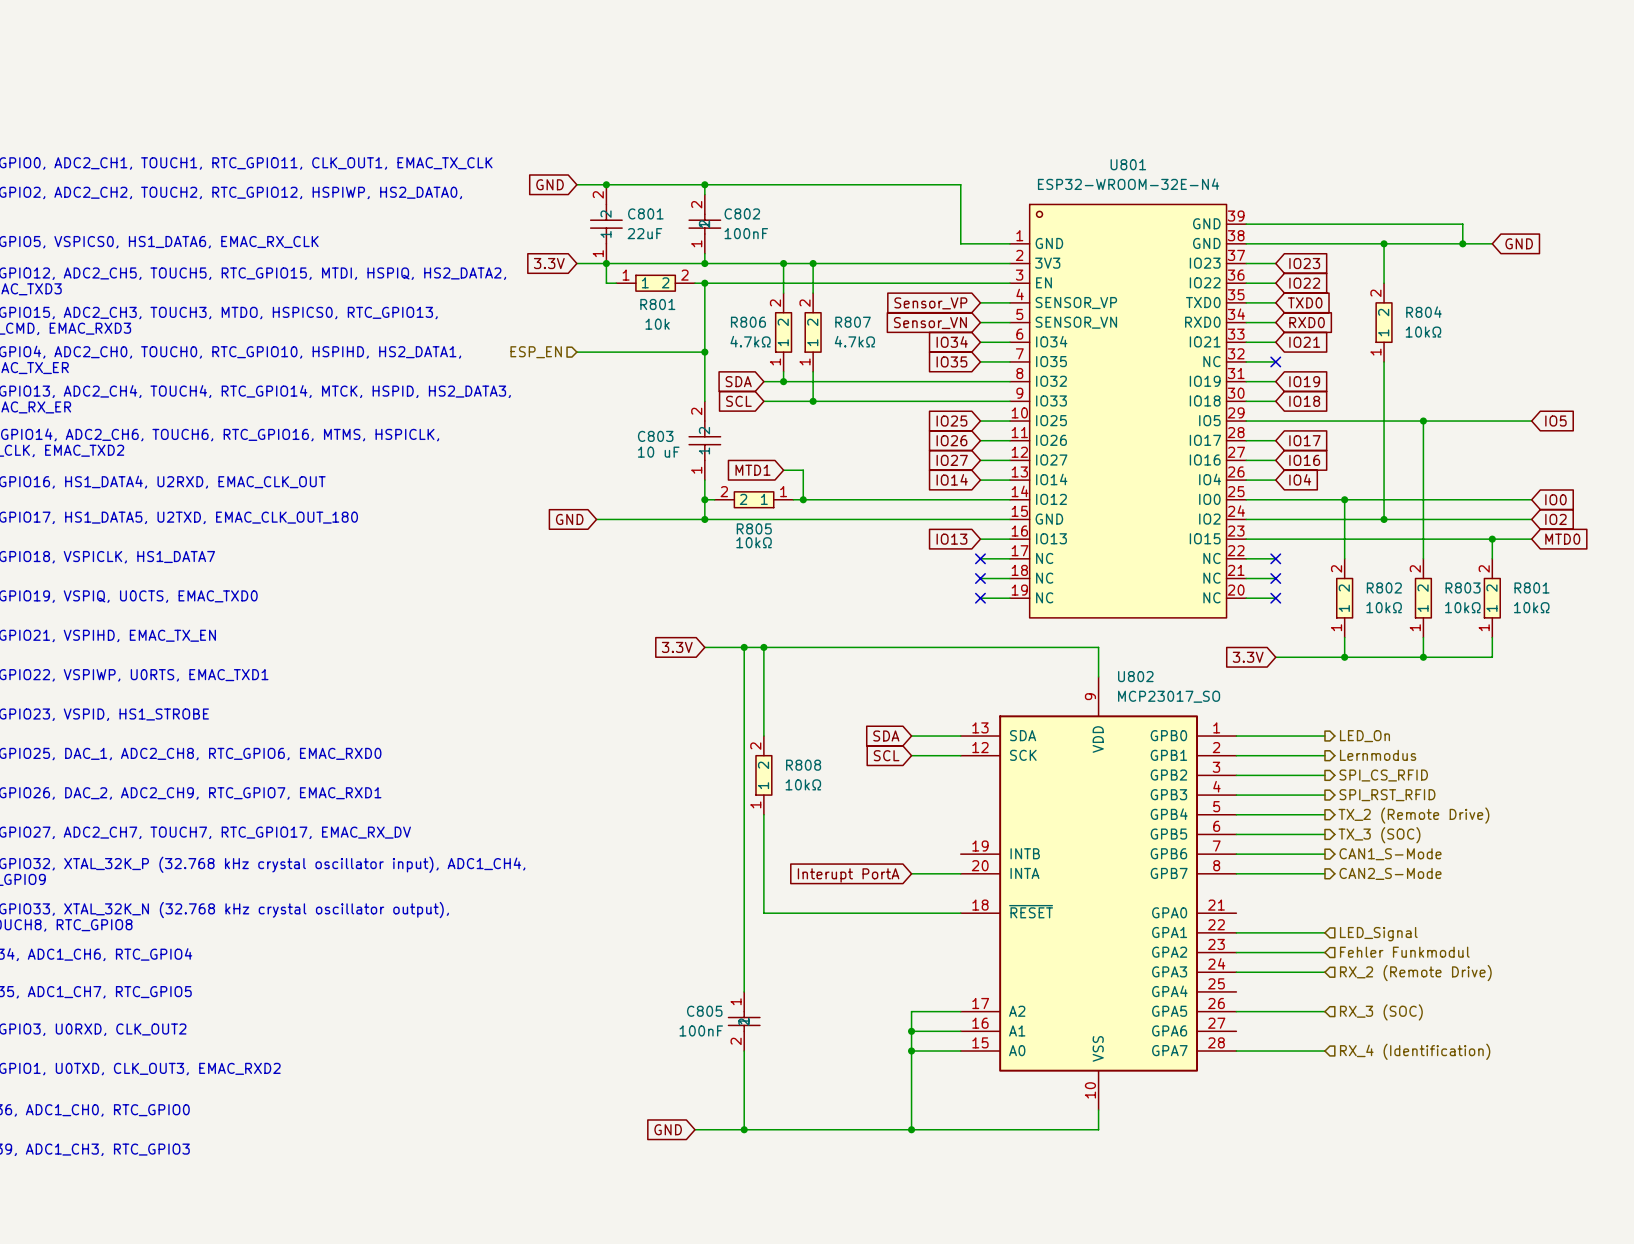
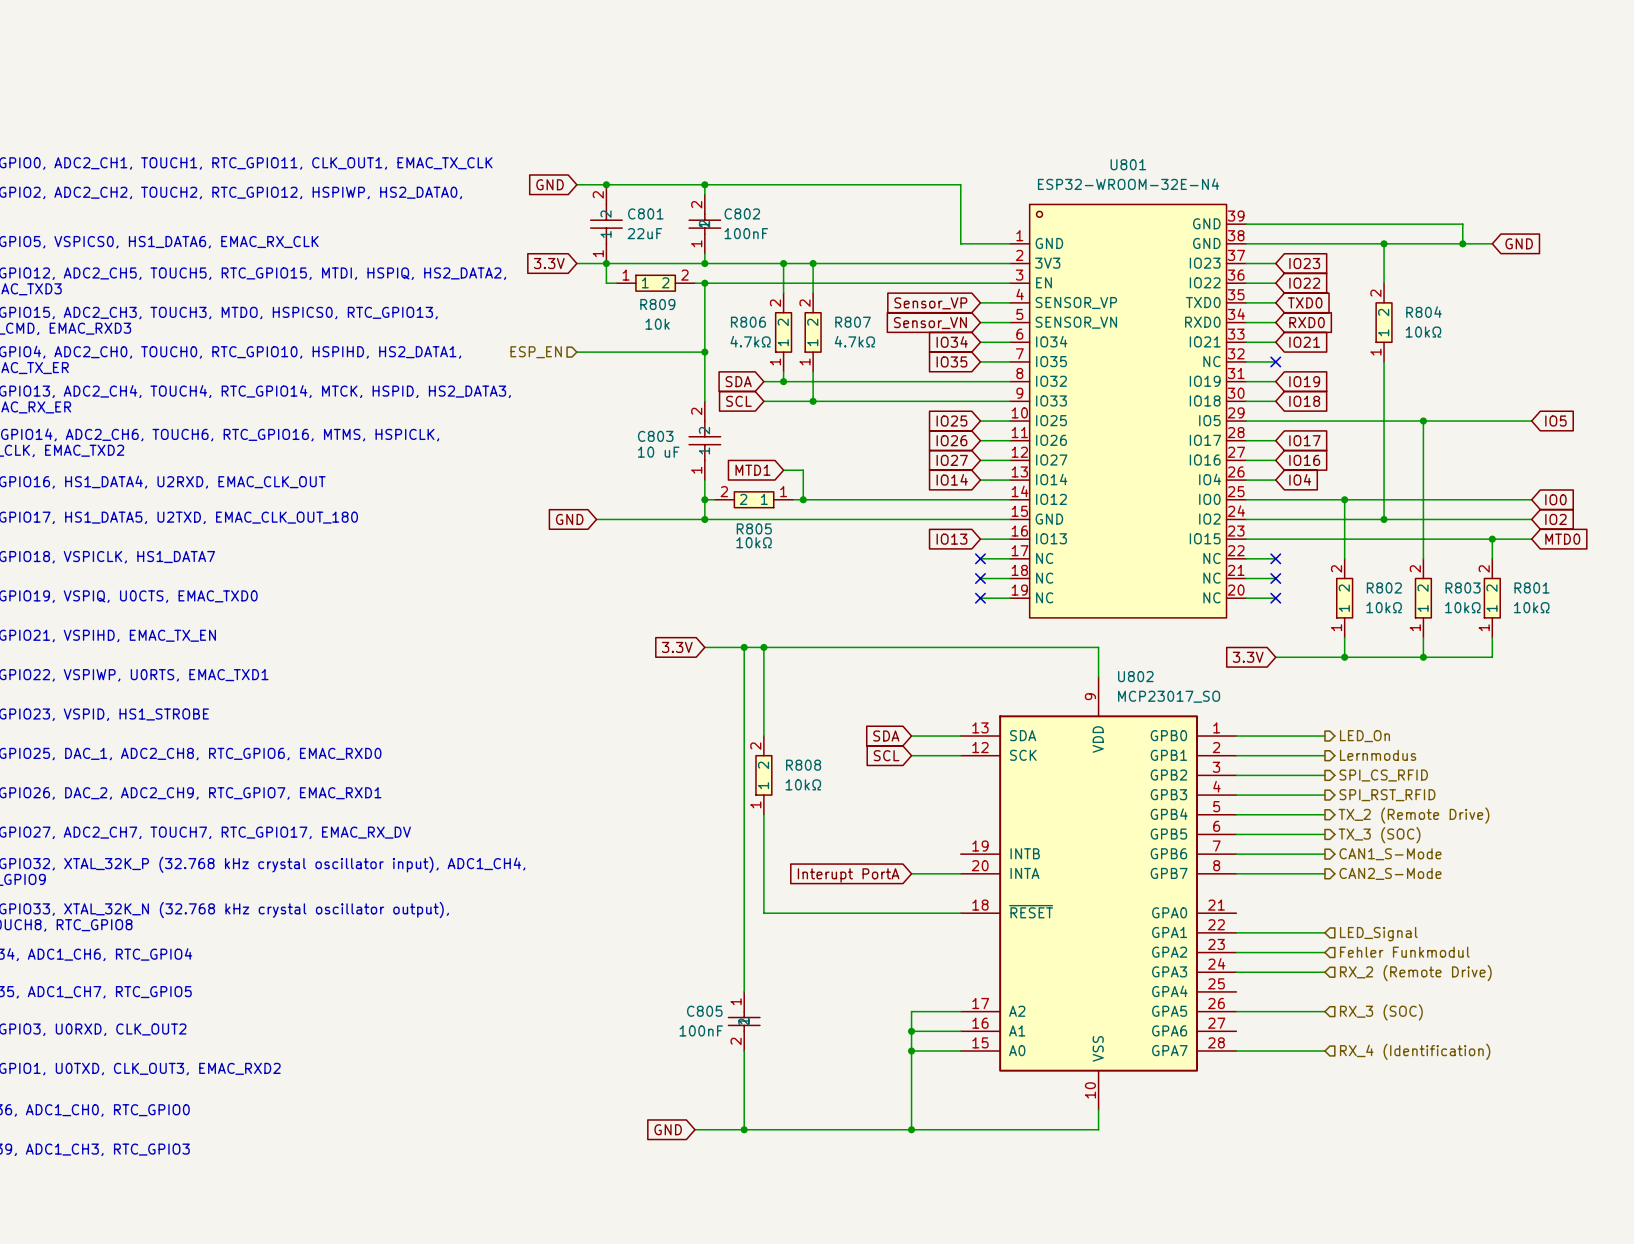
R801 name: R801 (657, 304) -> R809 (657, 304)

